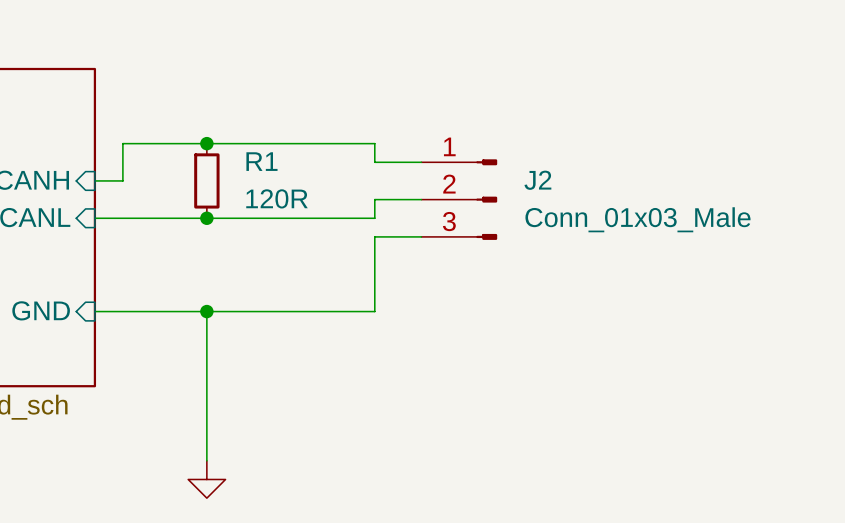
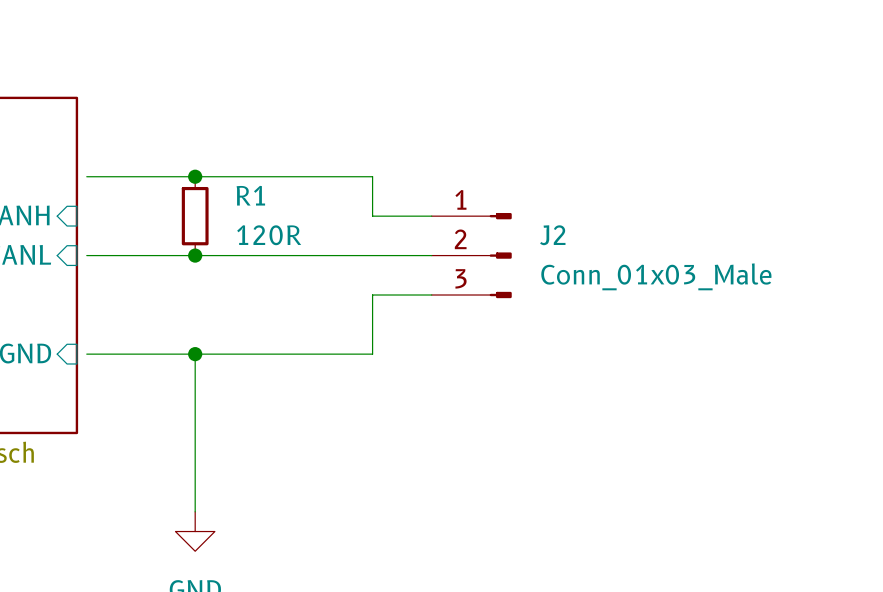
wire: (122, 143) (122, 180) (94, 180) -> (106, 176) (86, 176)
wire: (374, 162) (421, 162) -> (372, 196) (372, 216) (431, 216)
wire: (421, 199) (374, 199) (374, 218) -> (431, 255) (372, 255)
J2 position: (459, 199) -> (471, 255)
wire: (94, 218) (104, 218) -> none
wire: (421, 236) (374, 236) (374, 255) -> (431, 295) (372, 295)
wire: (94, 311) (104, 311) -> none

